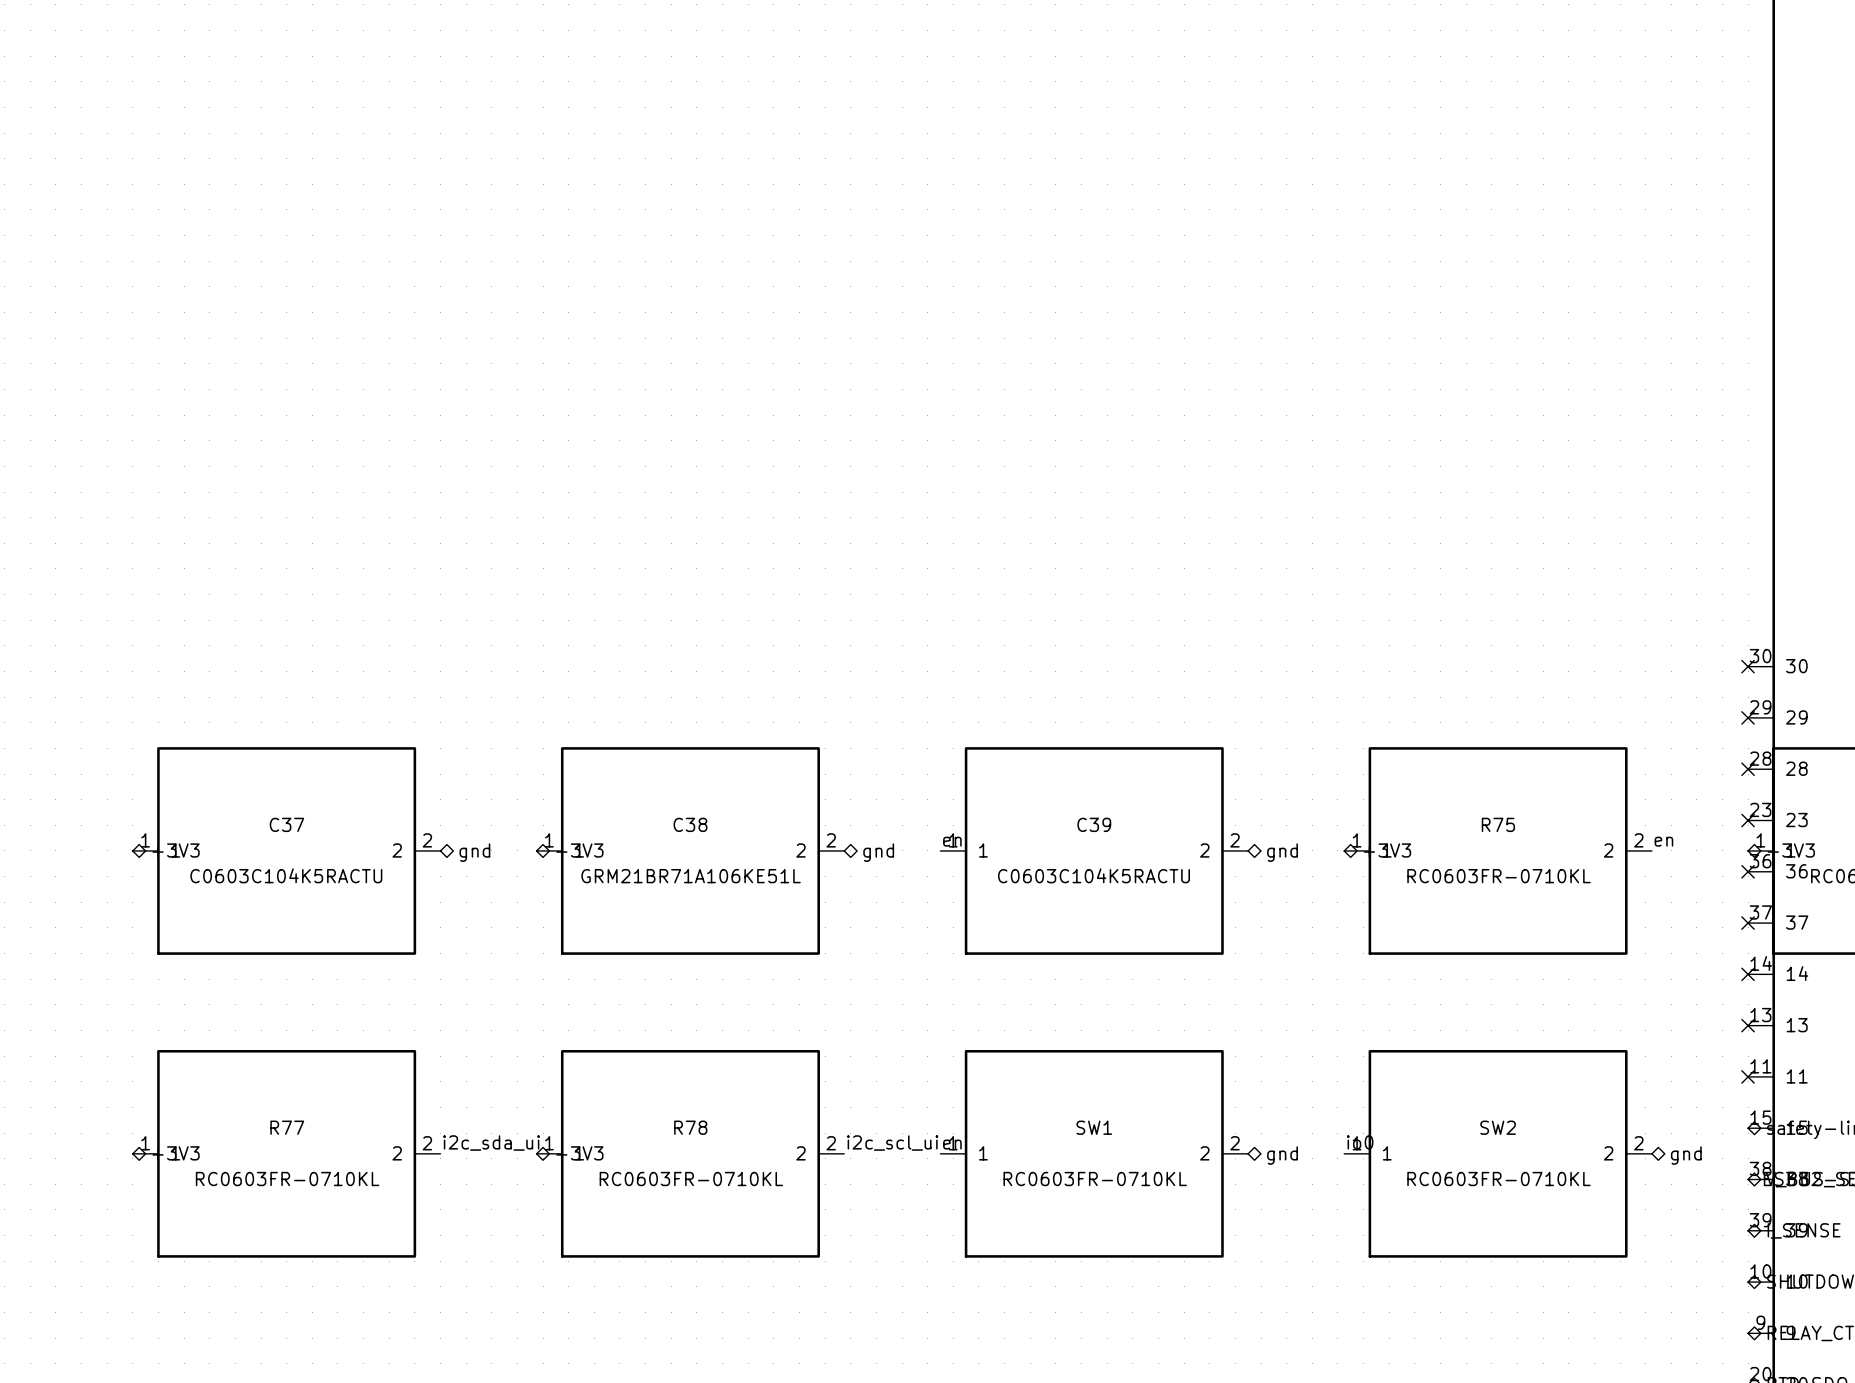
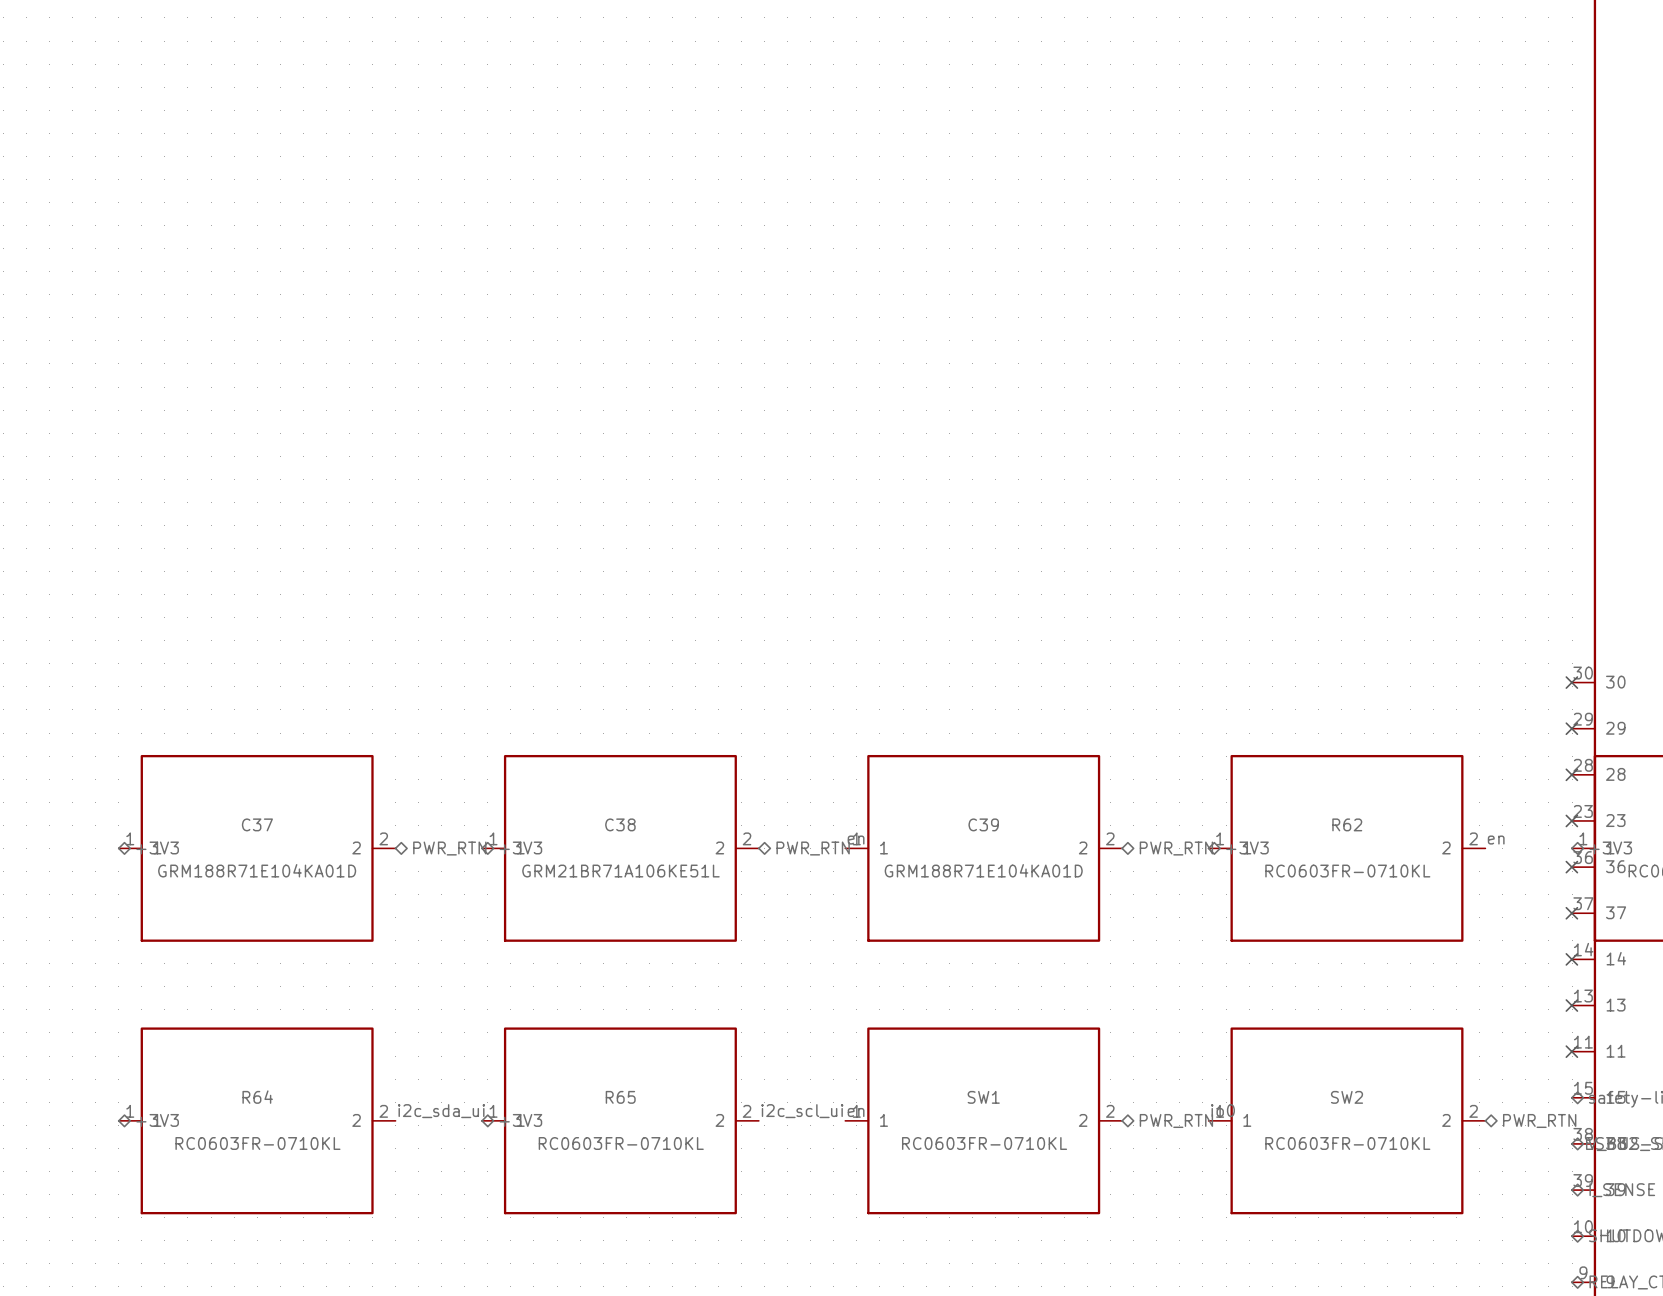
R75 name: R75 (1498, 824) -> R62 (1347, 824)
hierarchical label: gnd (474, 852) -> PWR_RTN (449, 848)
hierarchical label: gnd (878, 852) -> PWR_RTN (813, 848)
hierarchical label: gnd (1282, 852) -> PWR_RTN (1176, 848)
C37 value: C0603C104K5RACTU (286, 875) -> GRM188R71E104KA01D (257, 870)
C39 value: C0603C104K5RACTU (1093, 875) -> GRM188R71E104KA01D (983, 870)
R77 name: R77 (287, 1127) -> R64 (257, 1097)
R78 name: R78 (690, 1127) -> R65 (620, 1097)
hierarchical label: gnd (1282, 1155) -> PWR_RTN (1176, 1120)
hierarchical label: gnd (1686, 1155) -> PWR_RTN (1539, 1120)

